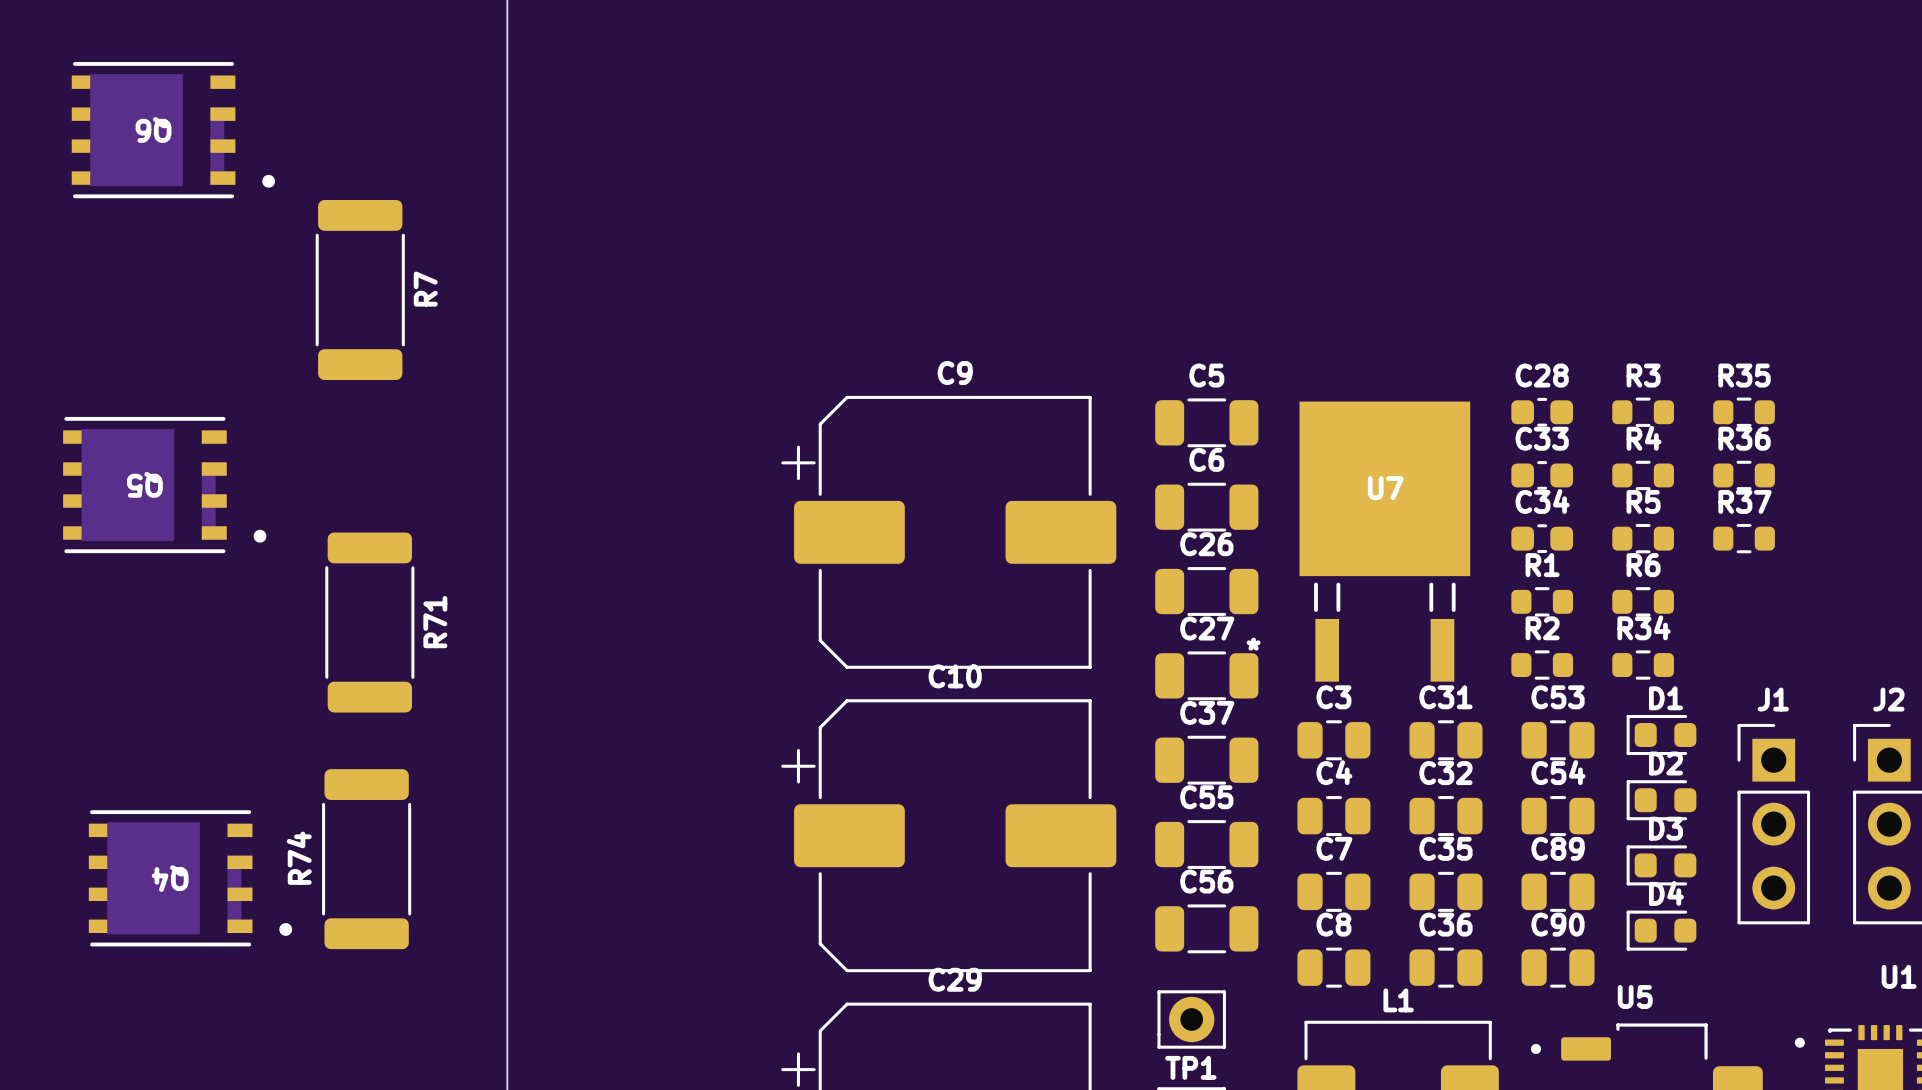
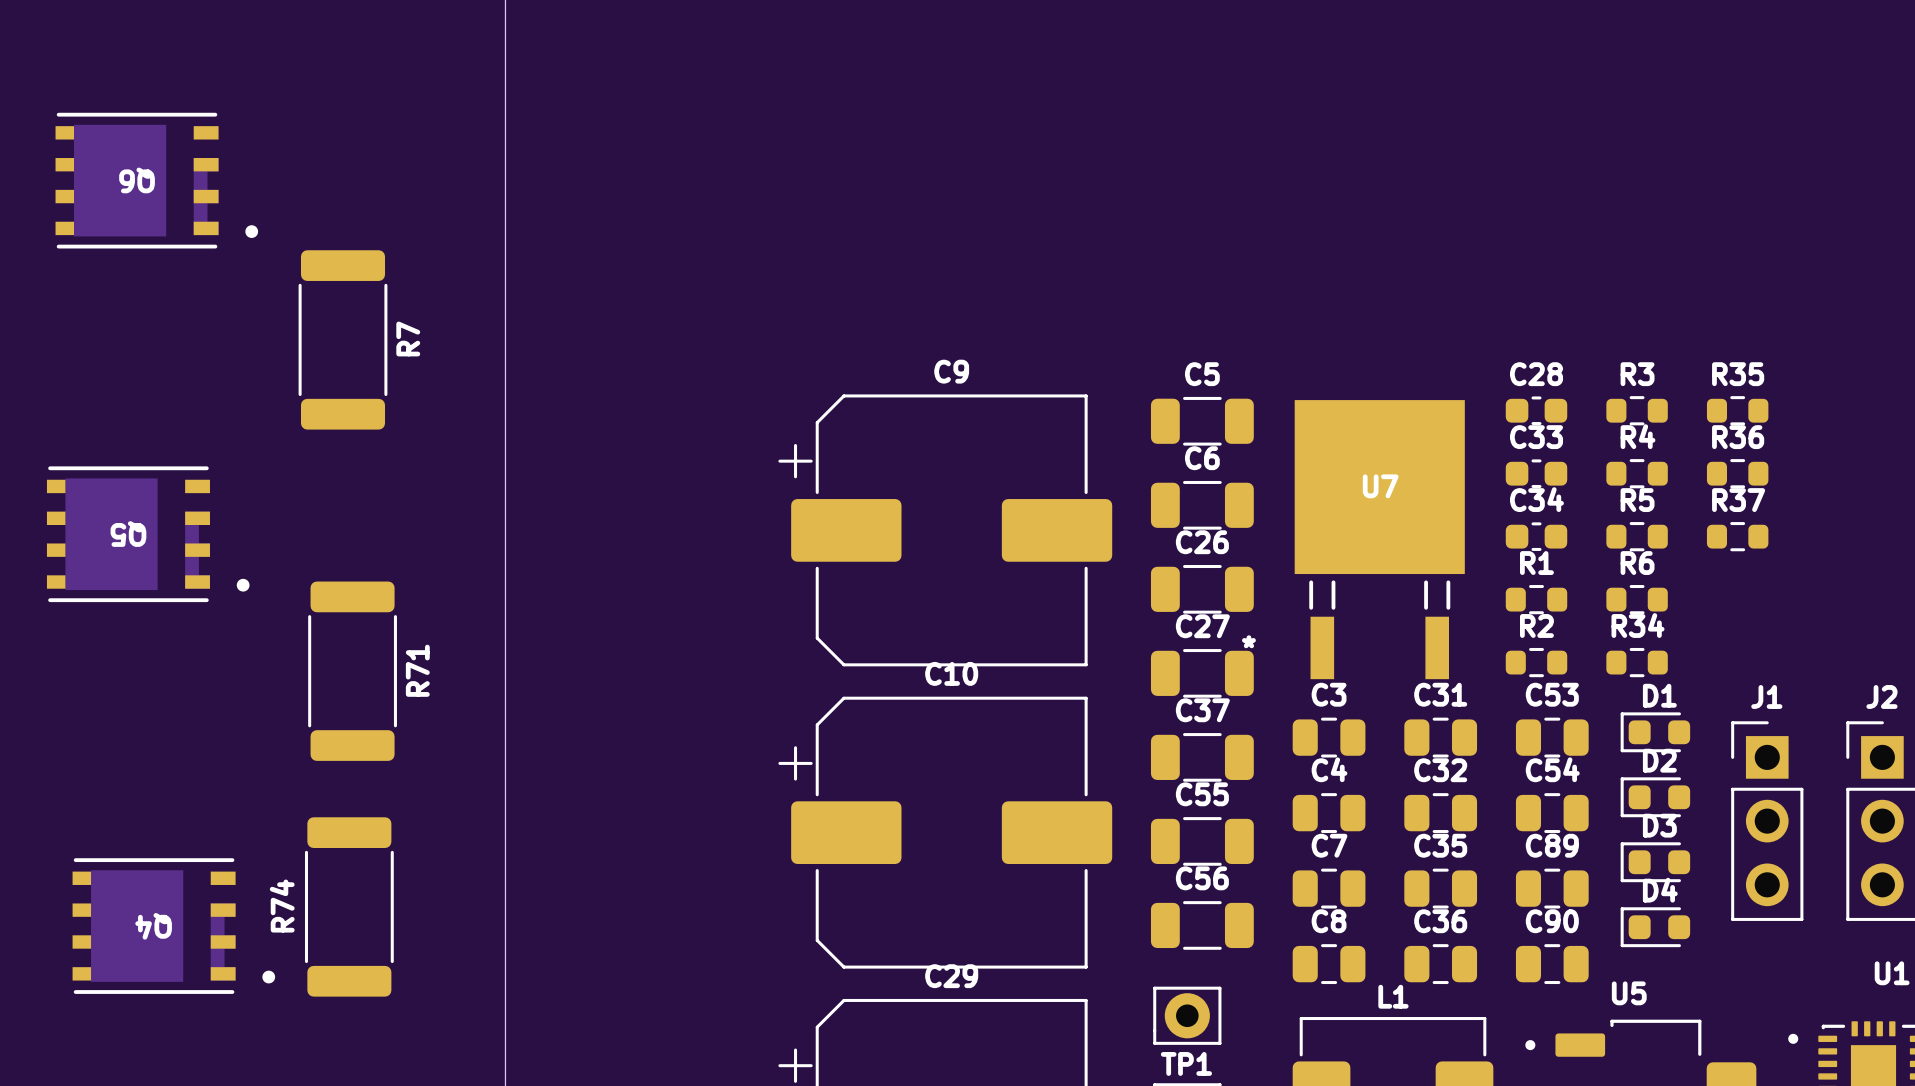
Q6 position: (173, 130) -> (156, 180)
R7 position: (360, 290) -> (343, 339)
Q5 position: (164, 485) -> (148, 534)
R71 position: (369, 622) -> (352, 671)
R74 position: (366, 859) -> (349, 906)
Q4 position: (190, 878) -> (173, 926)

